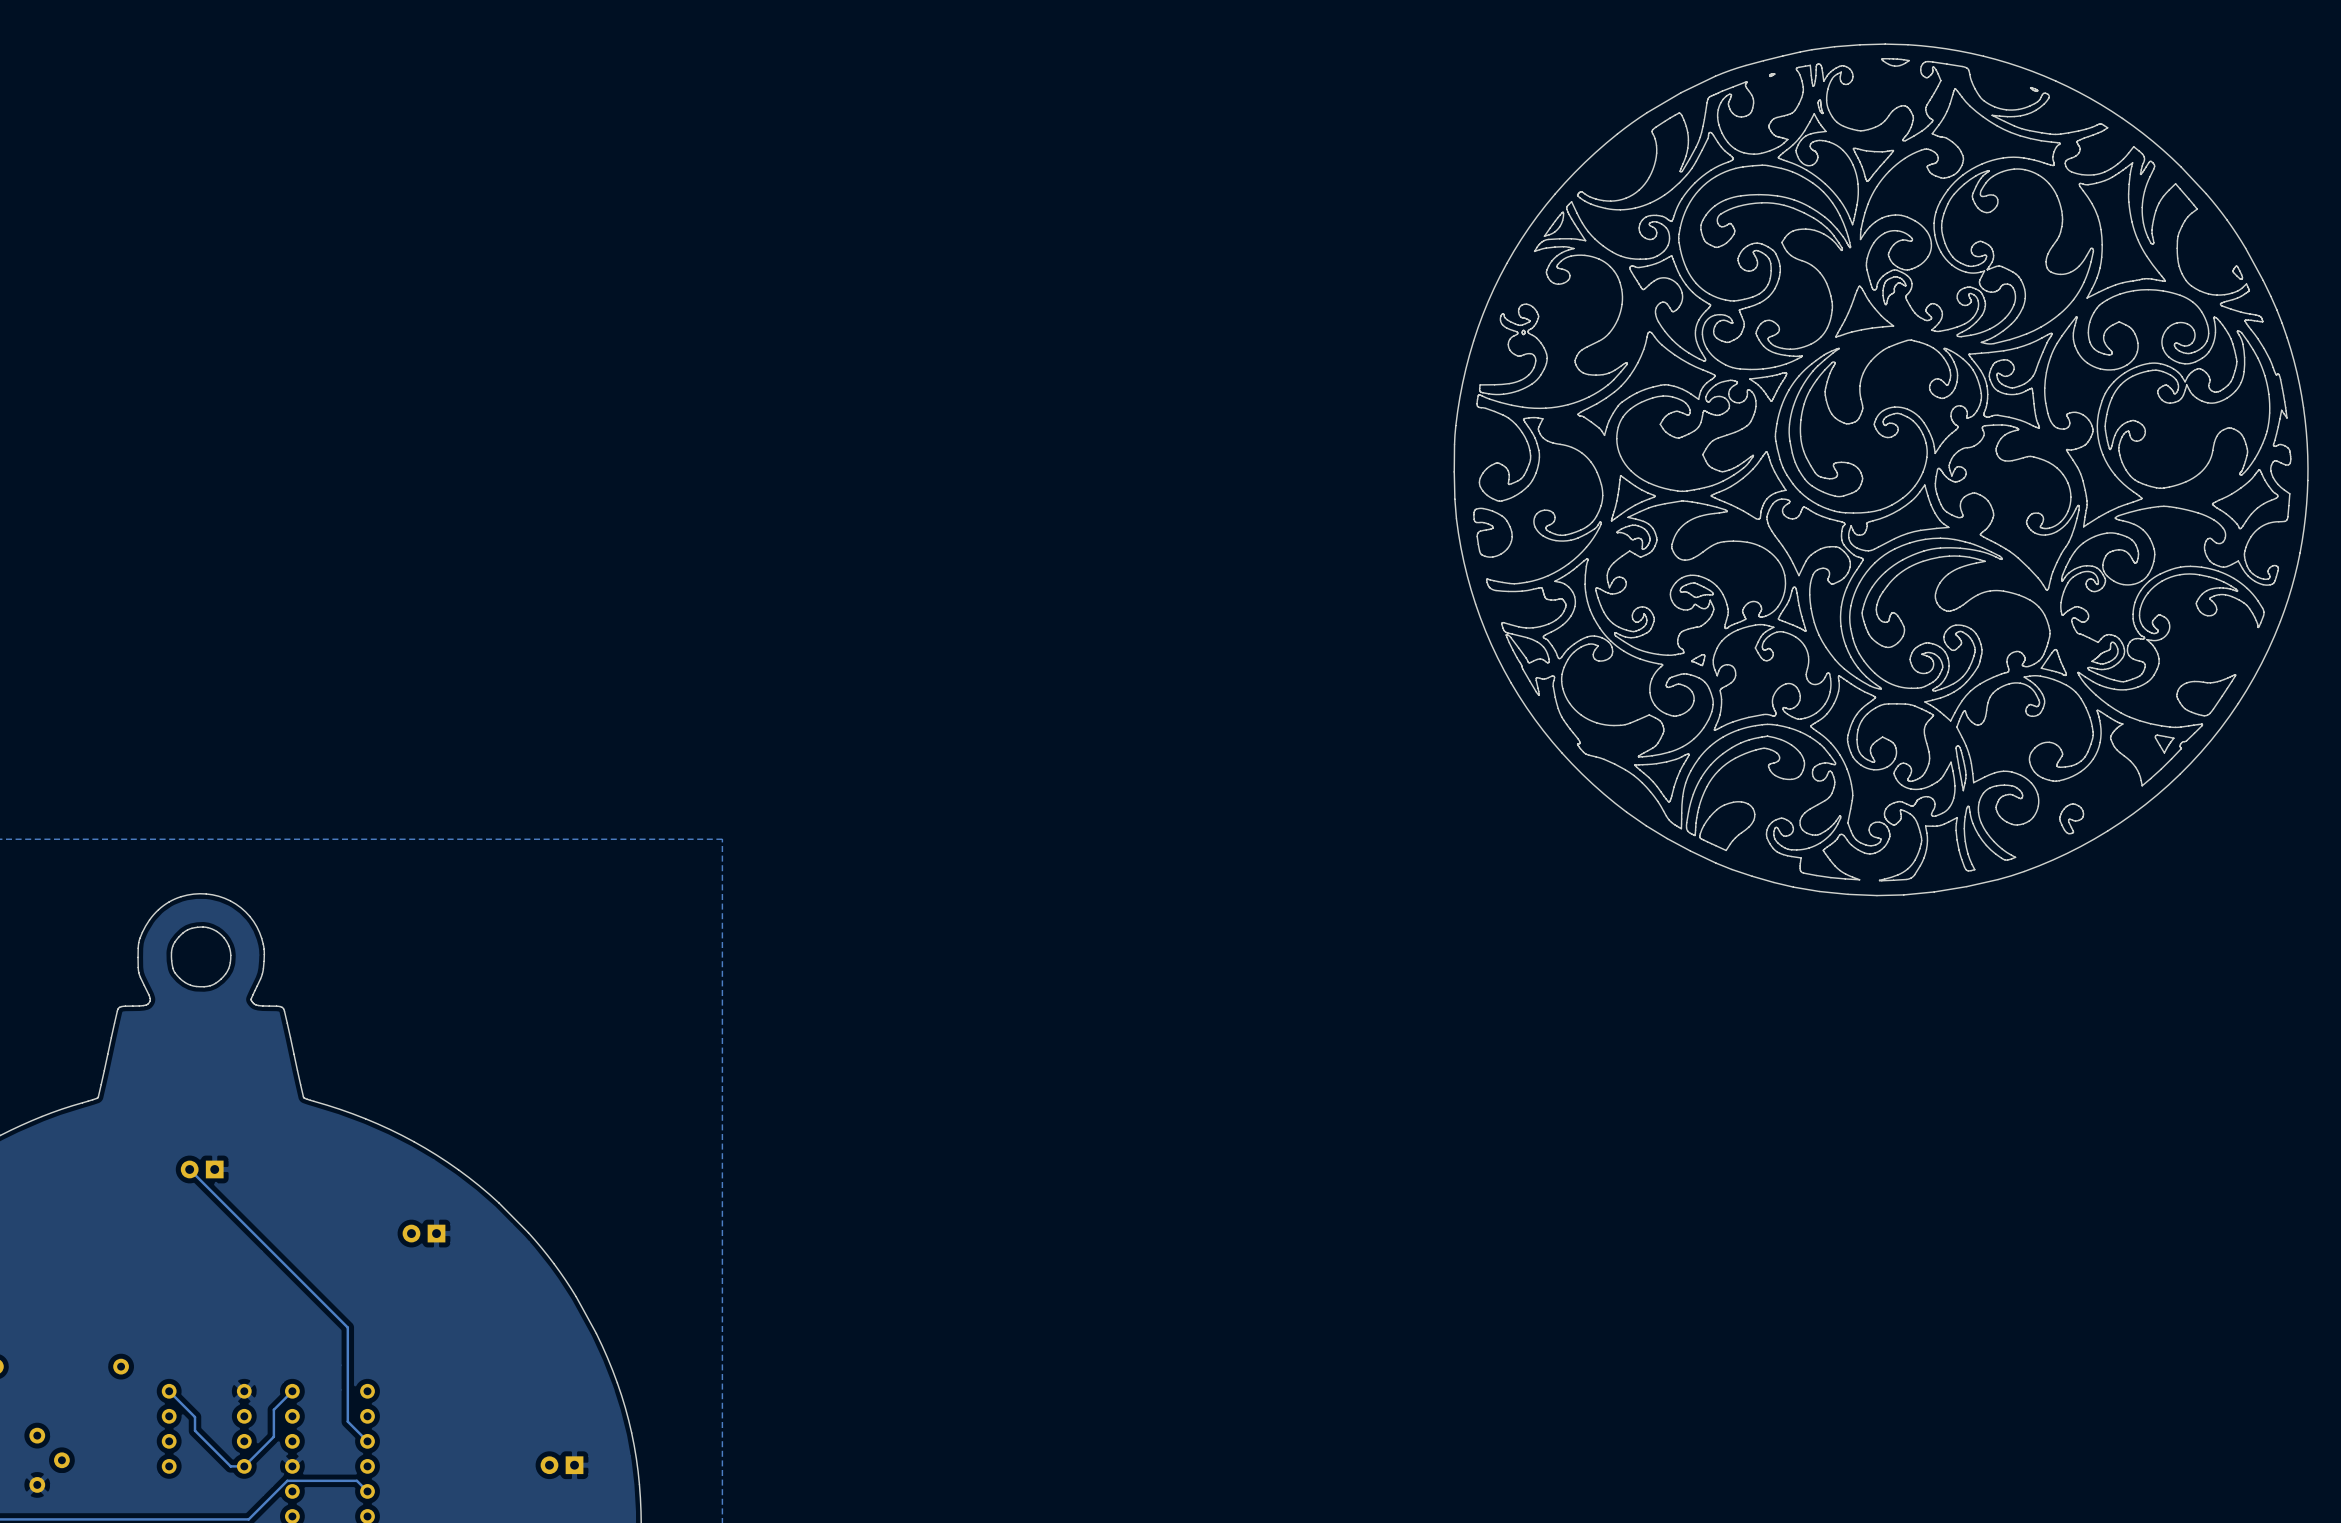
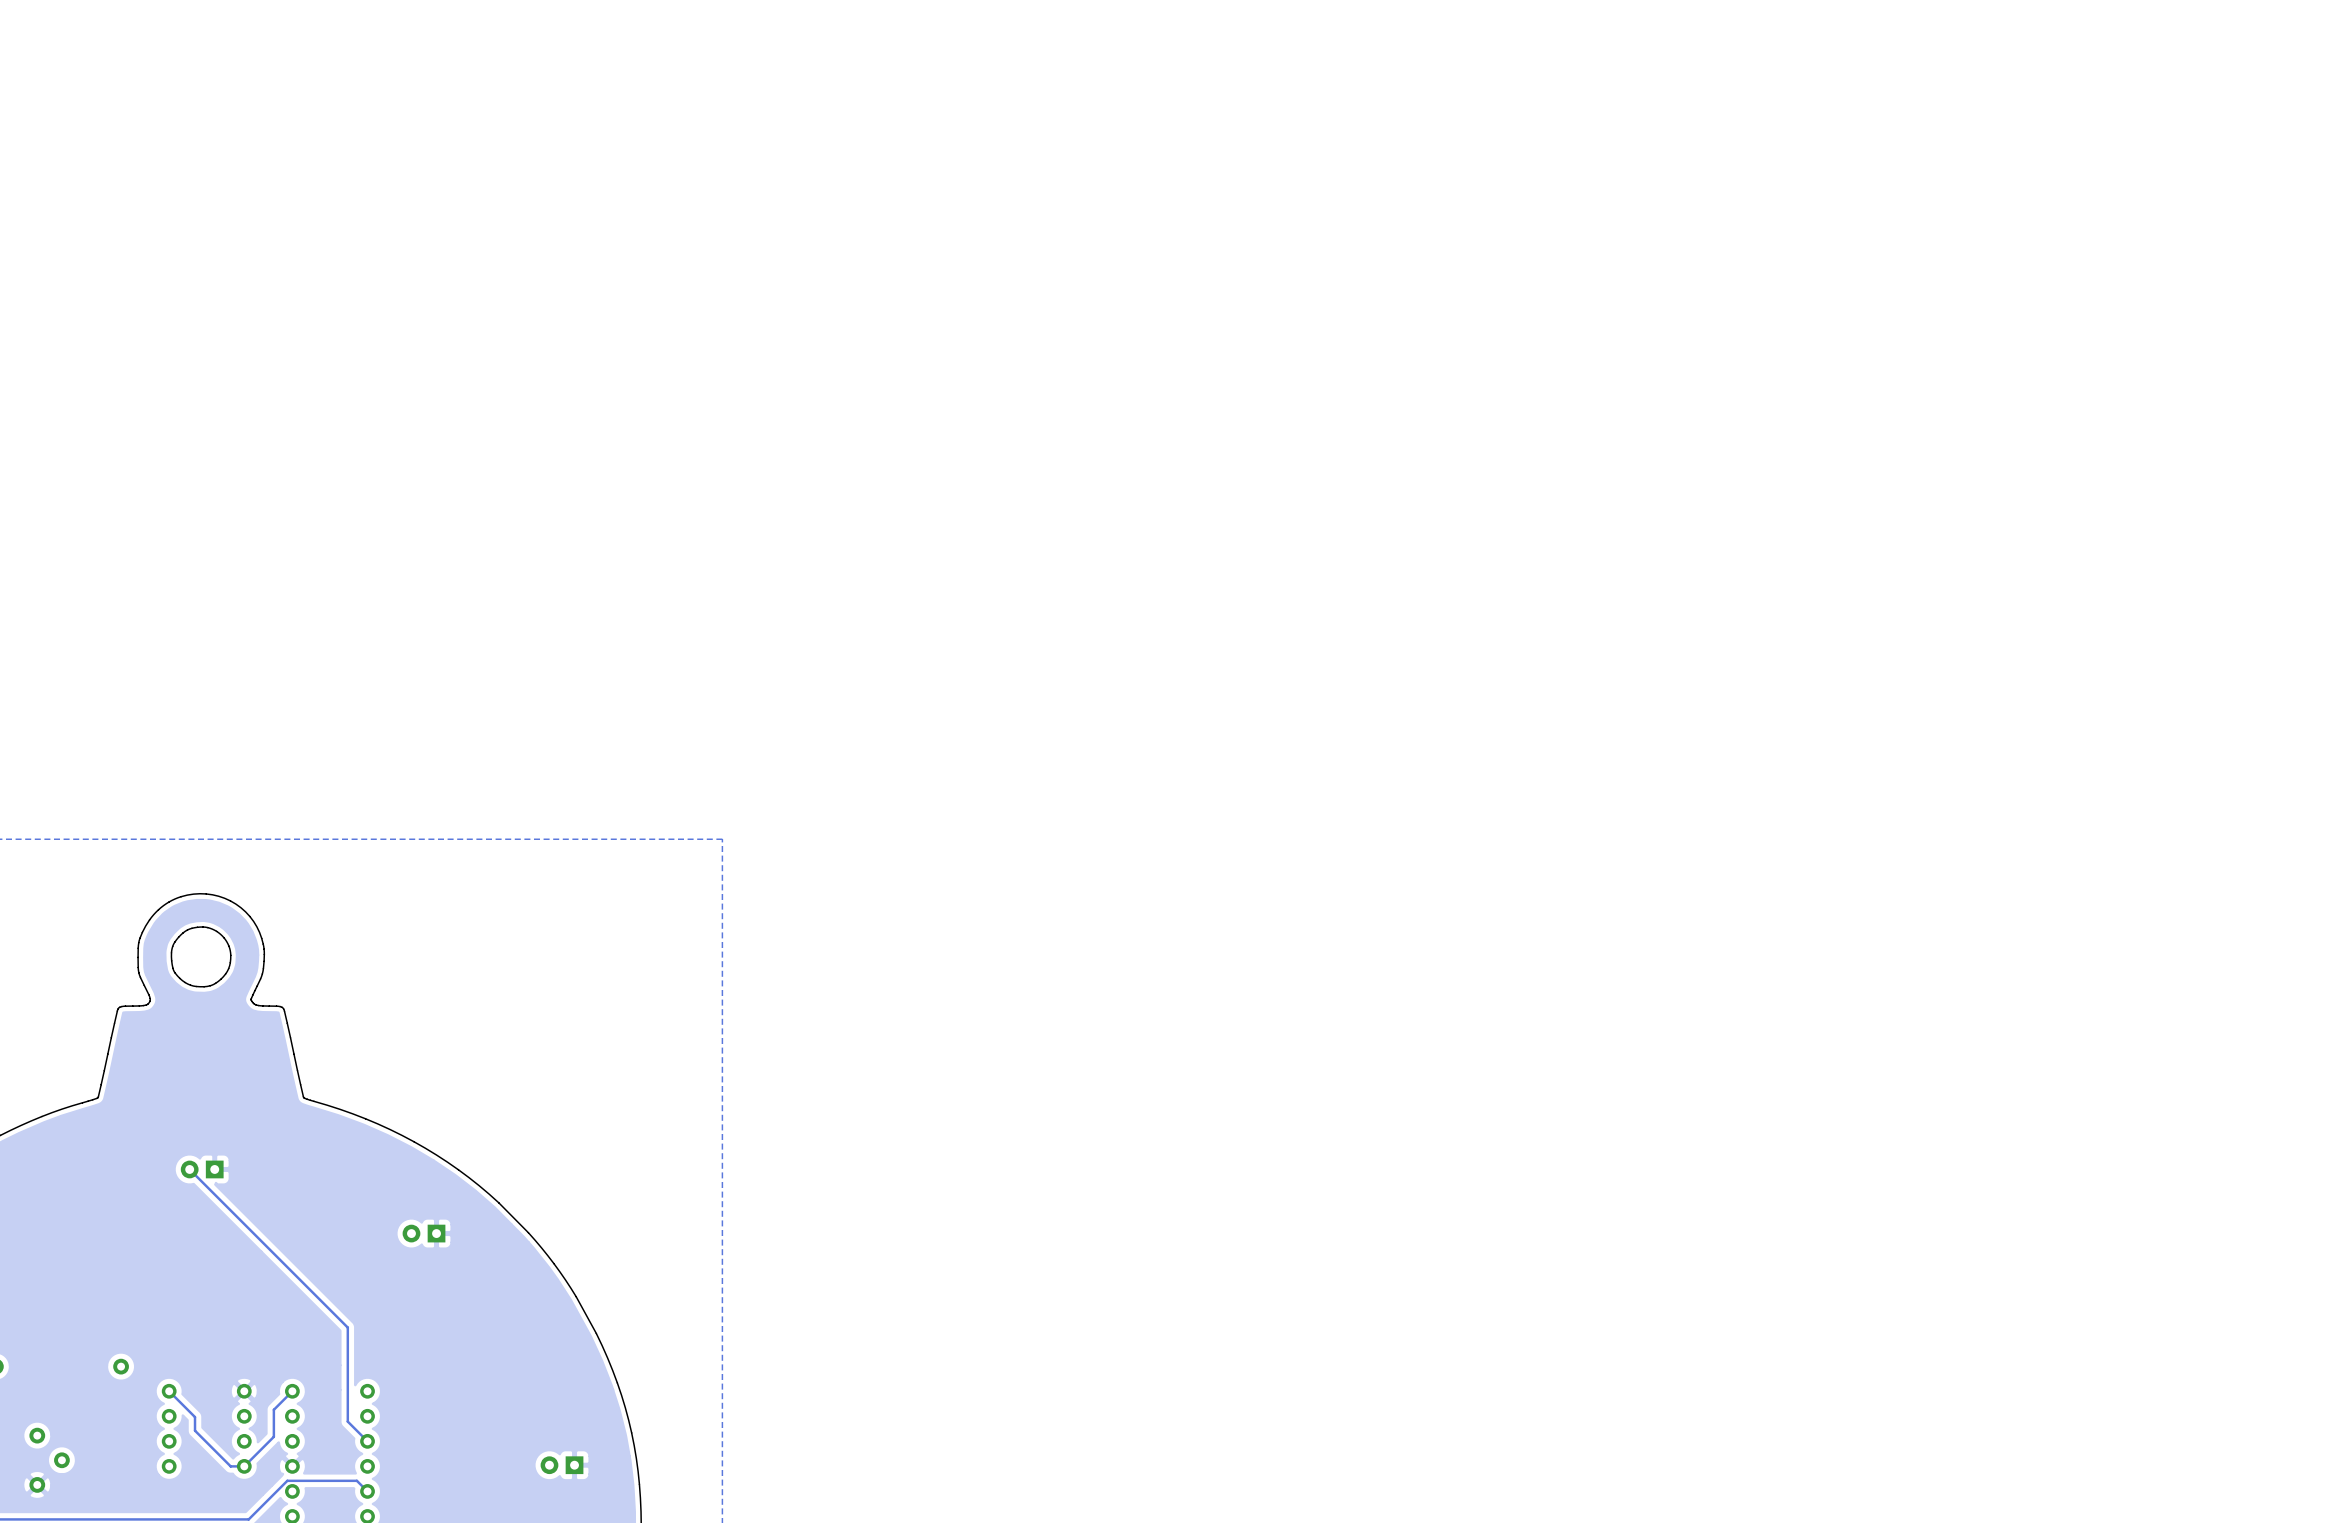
drawing: [1454, 44, 2309, 896] -> none

